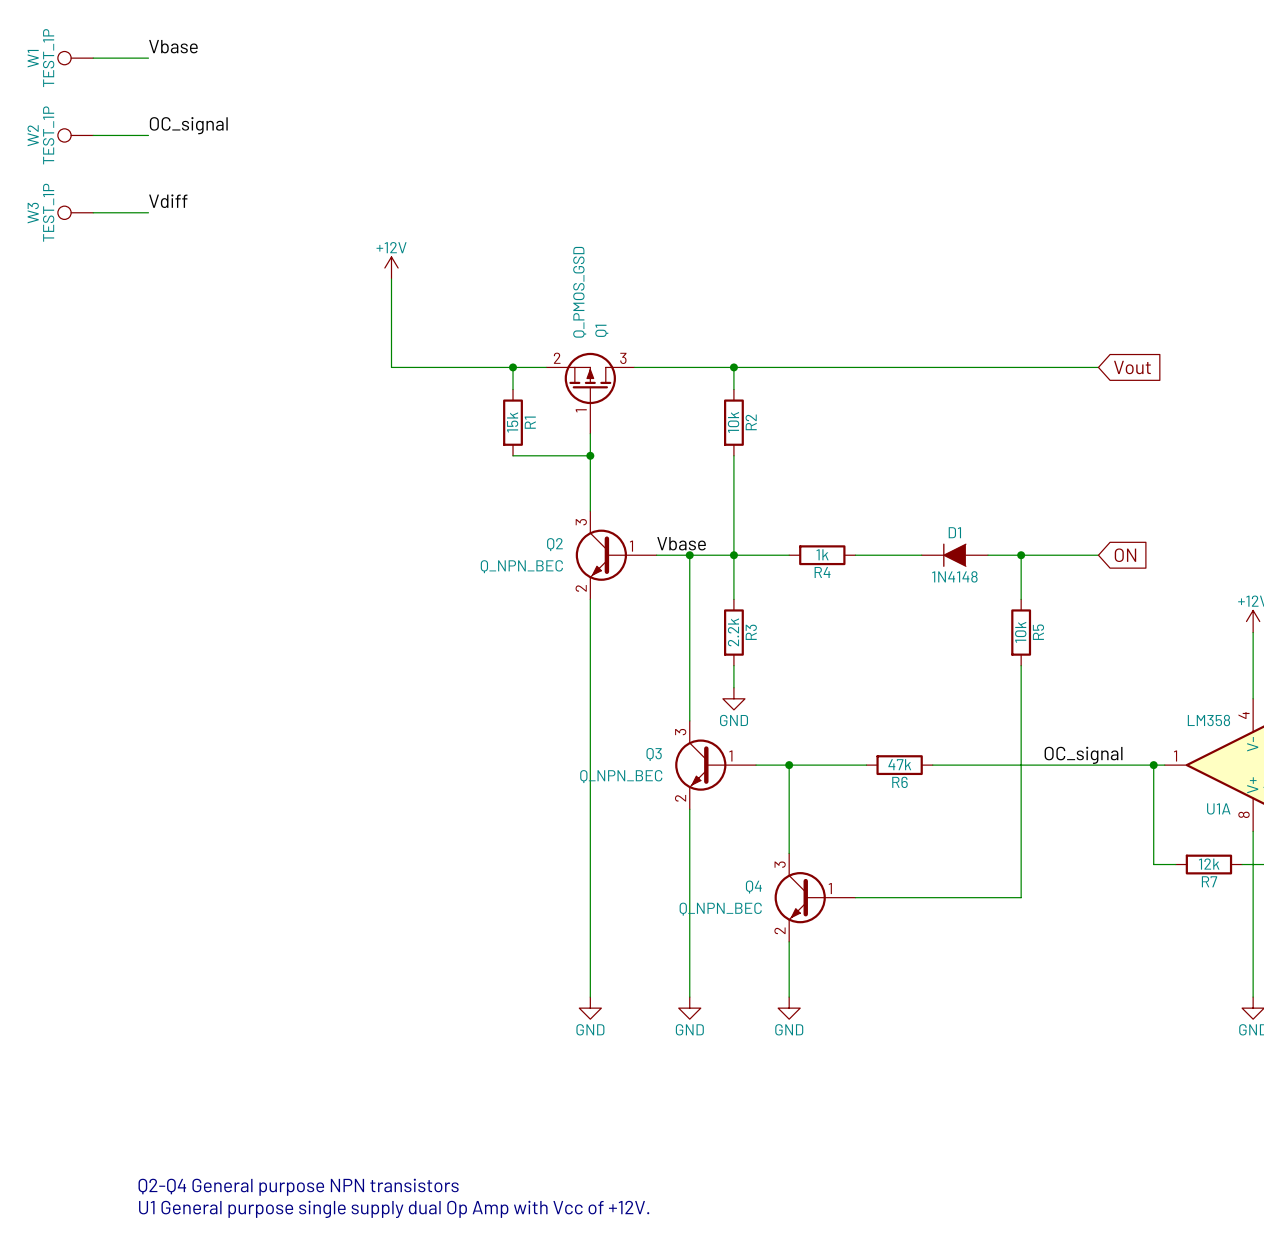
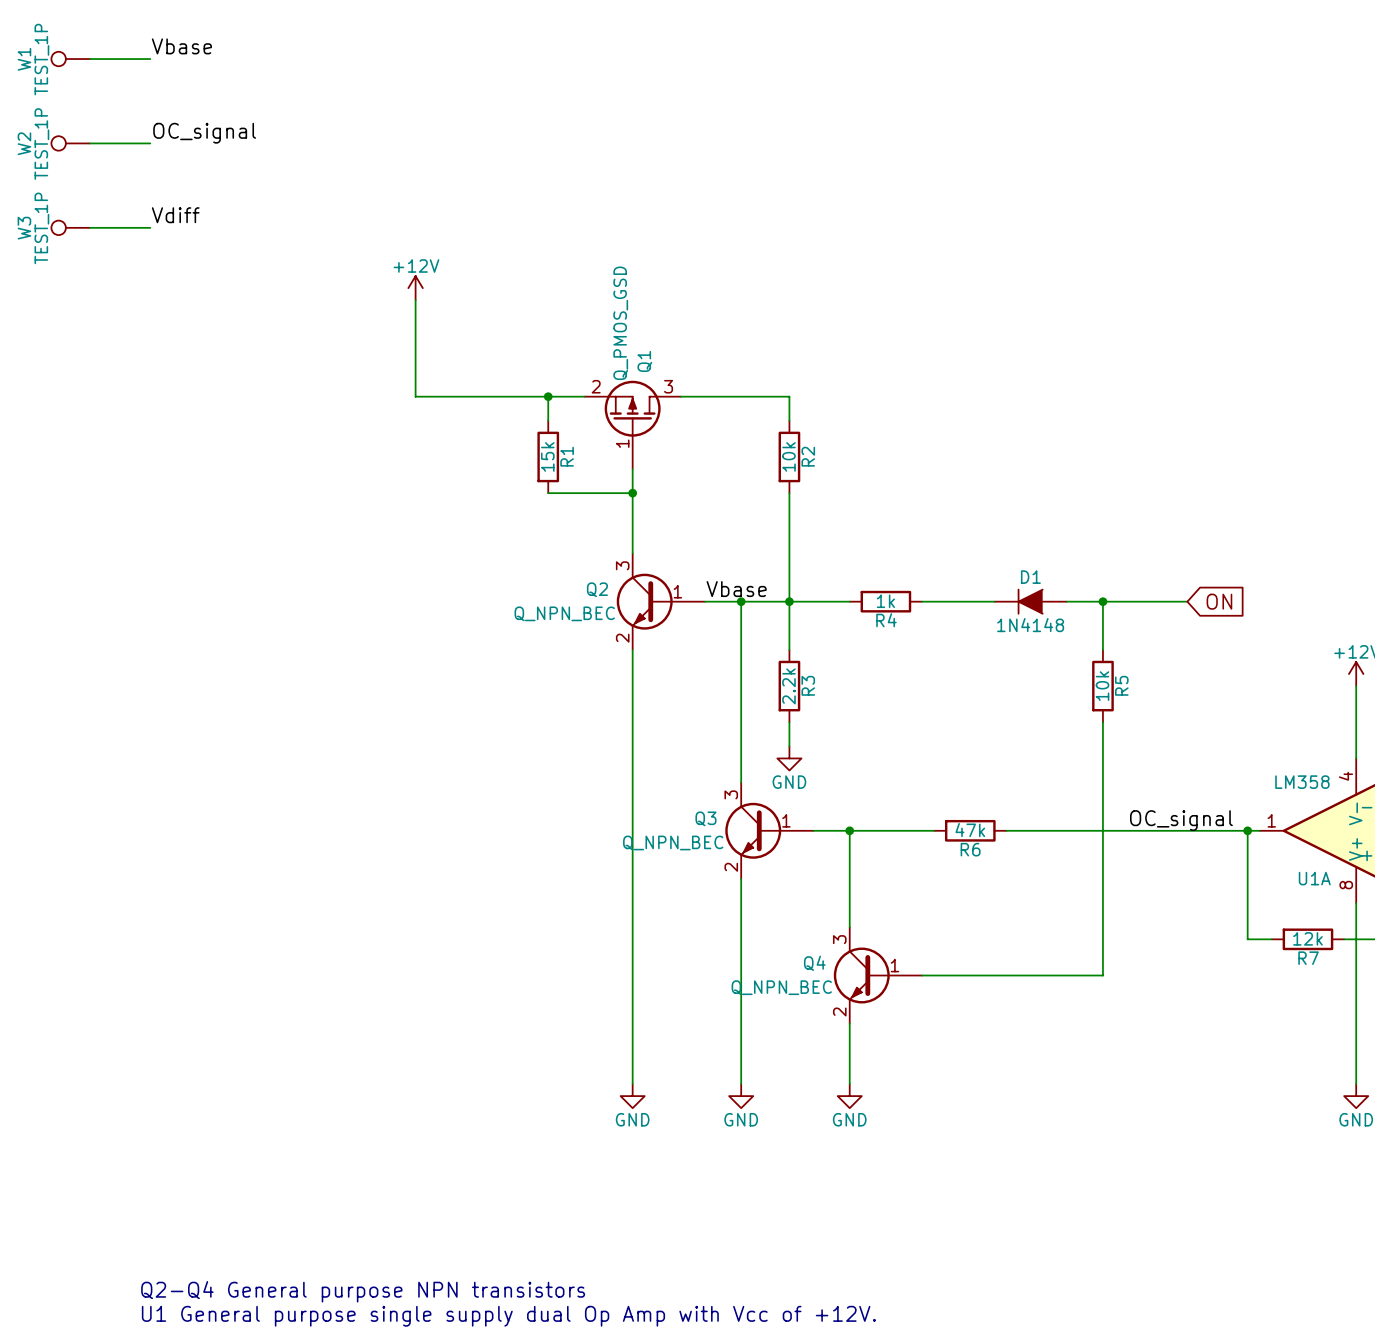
wire: (733, 367) (1098, 367) -> none
junction: (733, 367) -> none
global label: Vout (1132, 367) -> none

